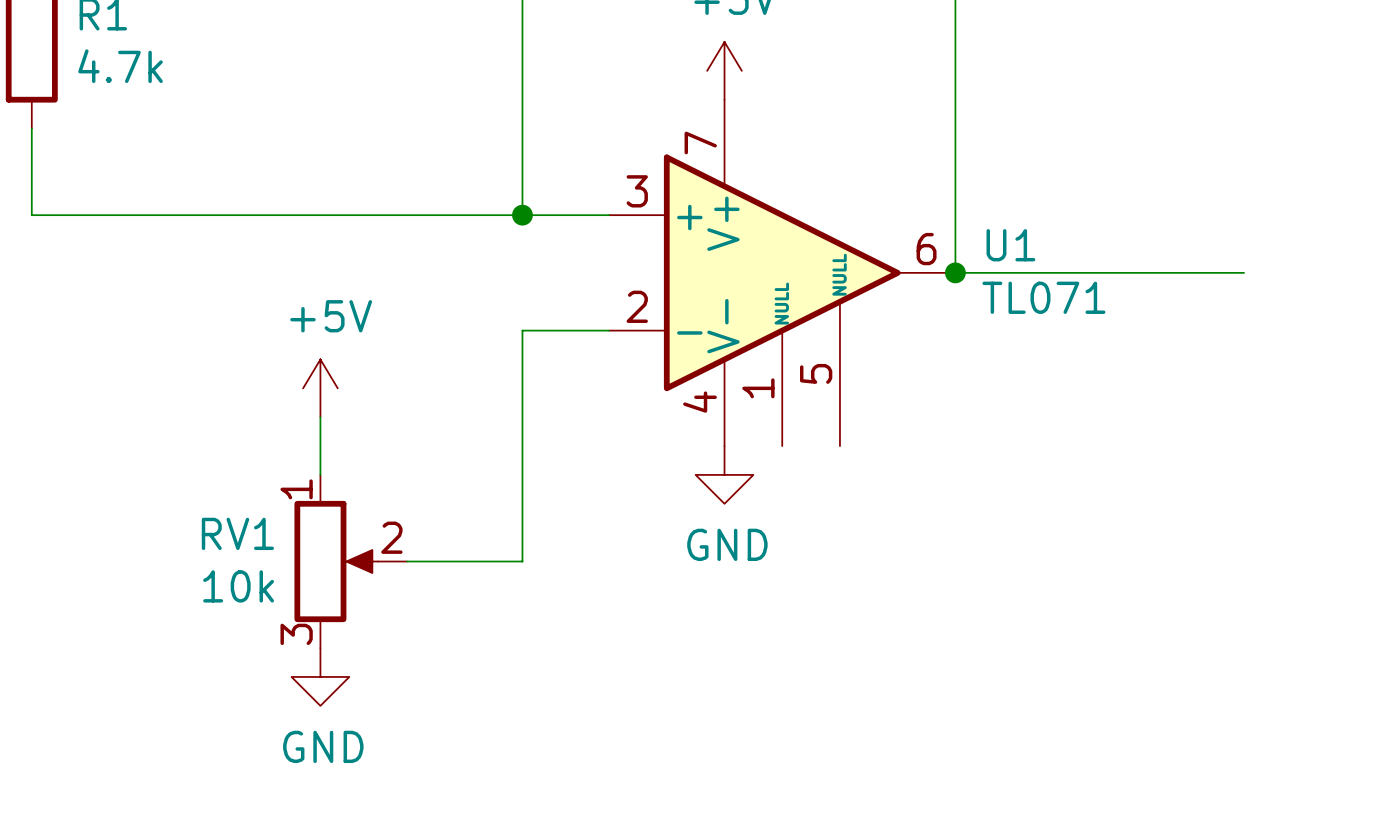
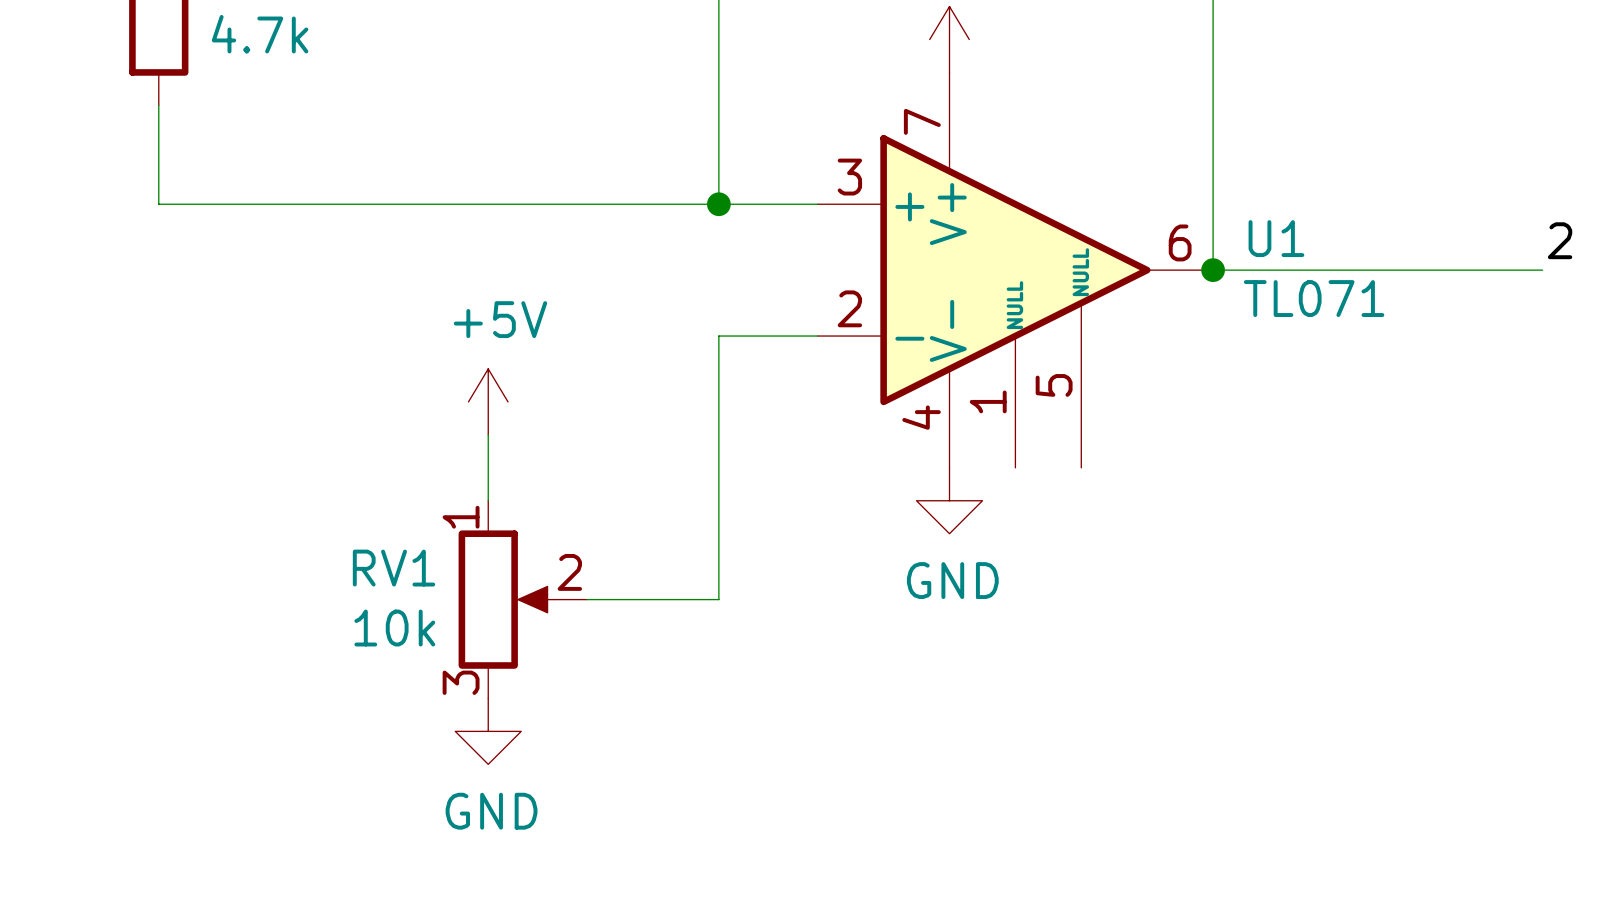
label: none -> 2 (1560, 240)

